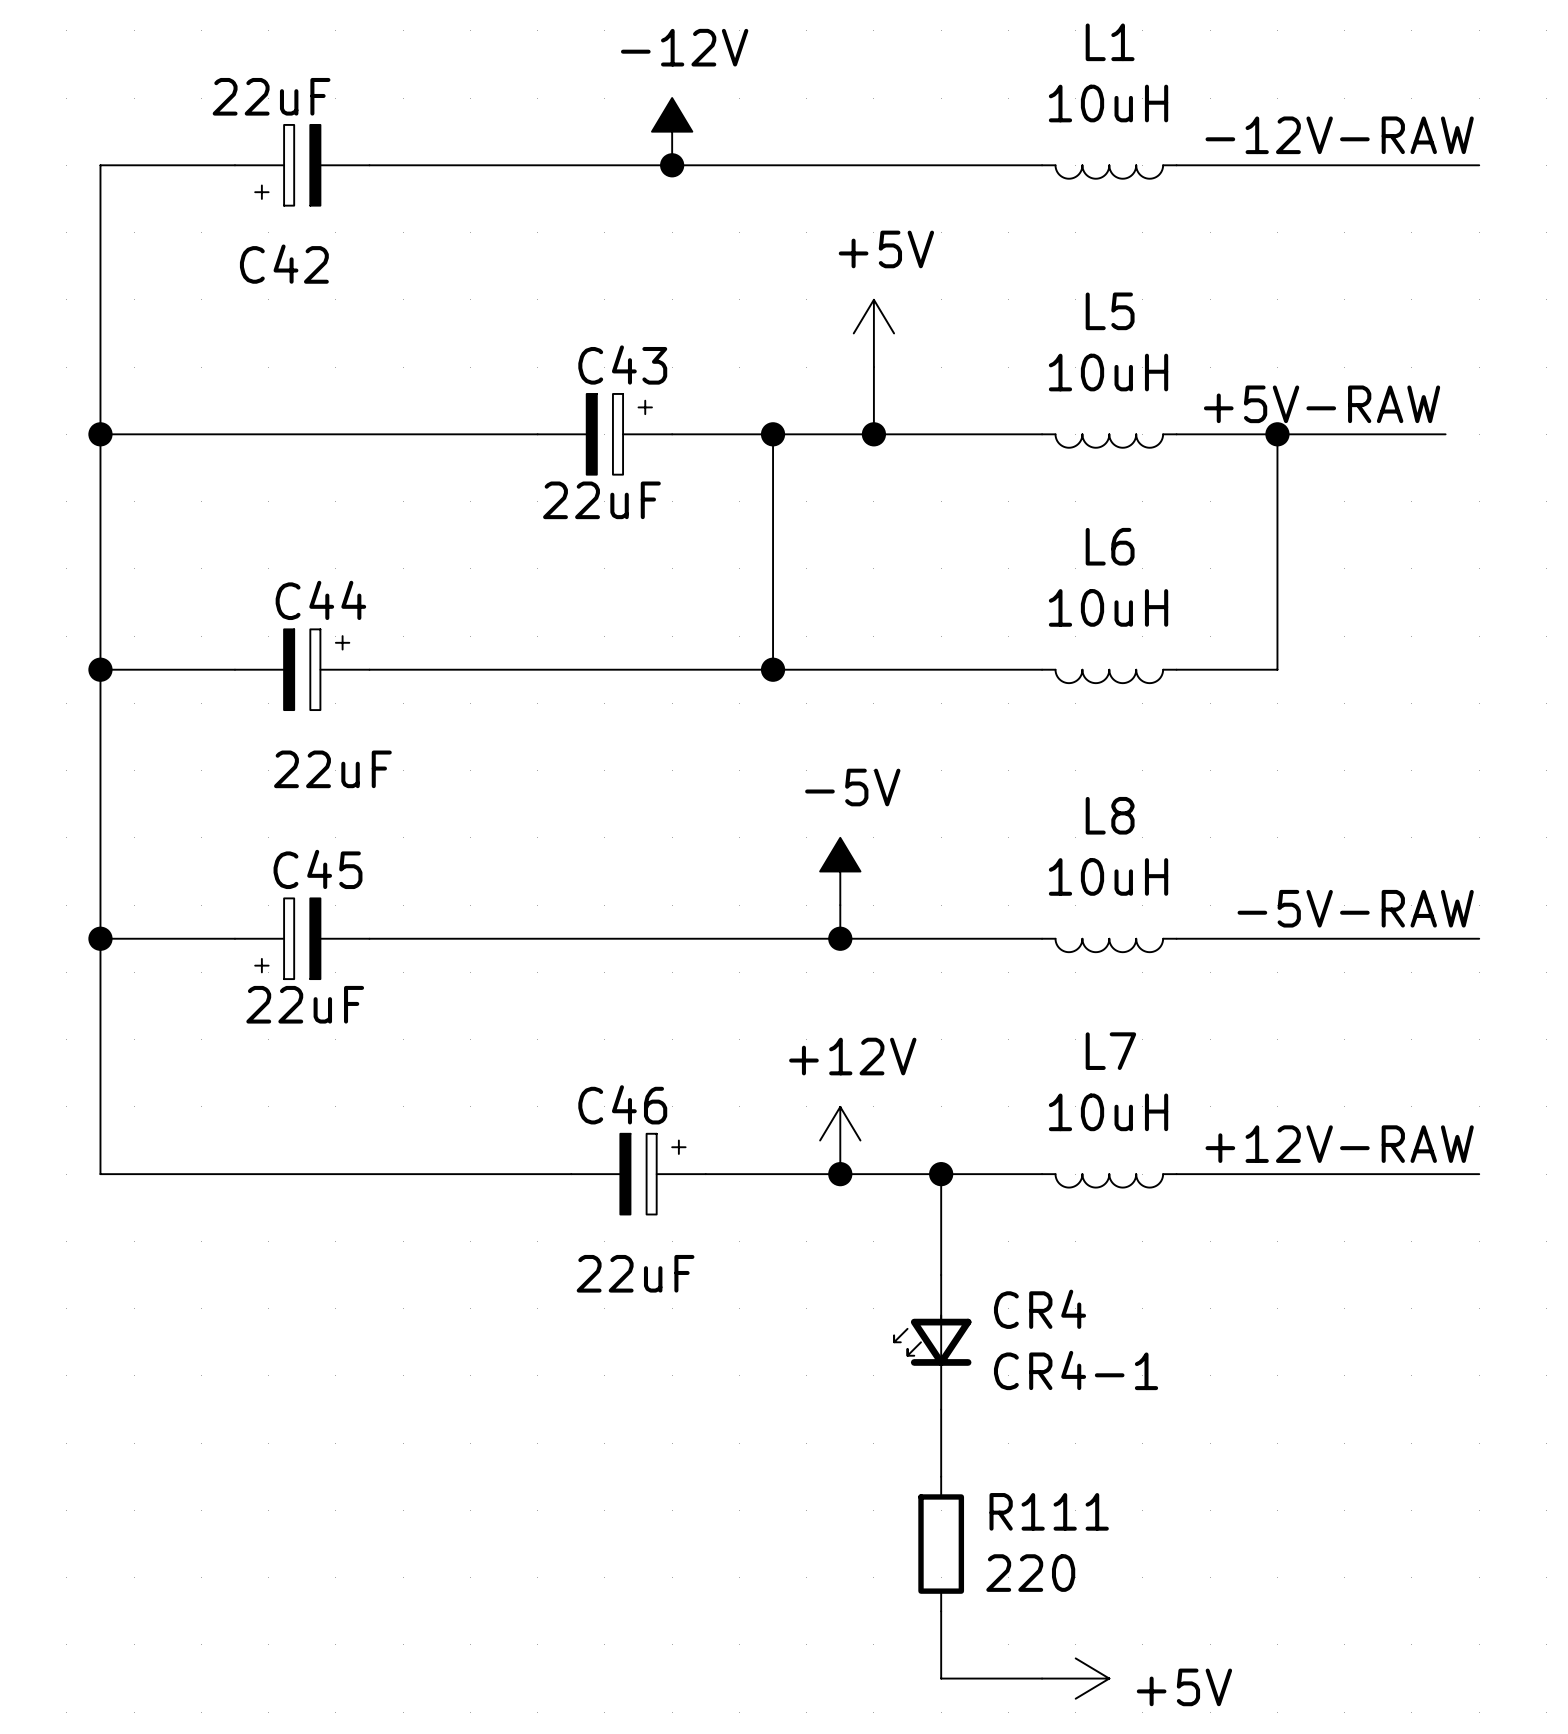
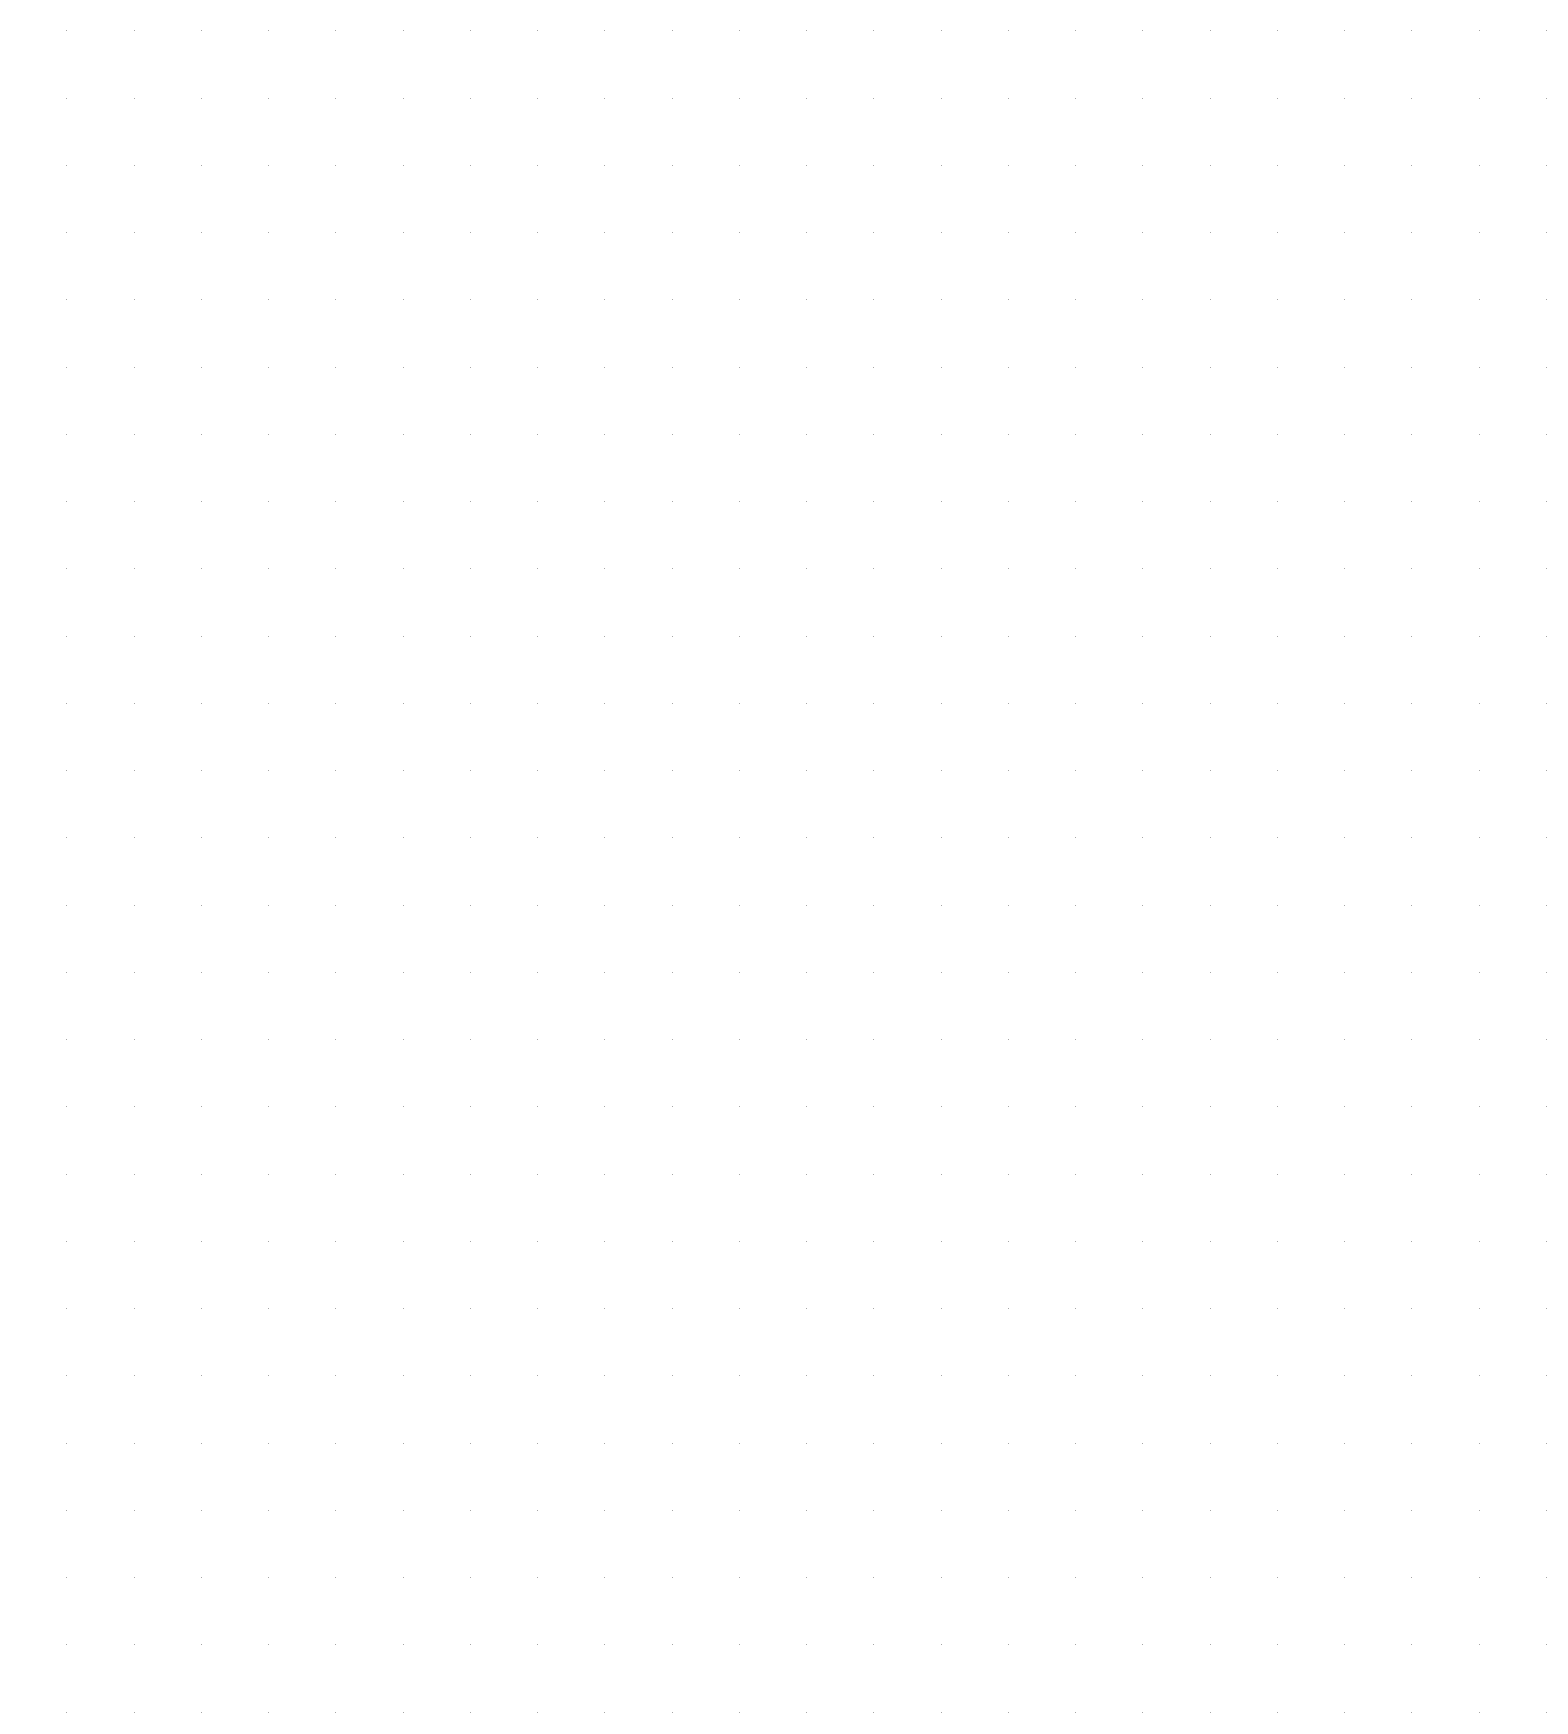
power symbol: -12V (672, 131) -> none
label: -12V-RAW (1339, 135) -> none
wire: (234, 165) (100, 165) (100, 1174) (571, 1174) -> none
C42: 22uF (302, 165) -> none
wire: (369, 165) (1042, 165) -> none
junction: (672, 165) -> none
wire: (1176, 165) (1479, 165) -> none
L1: 10uH (1109, 172) -> none
power symbol: +5V (873, 333) -> none
wire: (873, 367) (873, 434) -> none
label: +5V-RAW (1322, 404) -> none
wire: (100, 434) (537, 434) -> none
junction: (100, 434) -> none
C43: 22uF (604, 434) -> none
wire: (672, 434) (1042, 434) -> none
wire: (773, 434) (773, 669) -> none
junction: (773, 434) -> none
junction: (873, 434) -> none
wire: (1176, 434) (1445, 434) -> none
wire: (1277, 434) (1277, 669) (1176, 669) -> none
junction: (1277, 434) -> none
L5: 10uH (1109, 441) -> none
wire: (100, 669) (234, 669) -> none
junction: (100, 669) -> none
C44: 22uF (302, 669) -> none
wire: (369, 669) (1042, 669) -> none
junction: (773, 669) -> none
L6: 10uH (1109, 676) -> none
power symbol: -5V (840, 871) -> none
wire: (840, 905) (840, 938) -> none
label: -5V-RAW (1355, 908) -> none
wire: (100, 938) (234, 938) -> none
junction: (100, 938) -> none
C45: 22uF (302, 938) -> none
wire: (369, 938) (1042, 938) -> none
junction: (840, 938) -> none
wire: (1176, 938) (1479, 938) -> none
L8: 10uH (1109, 945) -> none
power symbol: +12V (840, 1140) -> none
label: +12V-RAW (1339, 1144) -> none
C46: 22uF (638, 1174) -> none
wire: (705, 1174) (1042, 1174) -> none
junction: (840, 1174) -> none
wire: (941, 1174) (941, 1275) -> none
junction: (941, 1174) -> none
wire: (1176, 1174) (1479, 1174) -> none
L7: 10uH (1109, 1180) -> none
CR4: CR4-1 (932, 1342) -> none
wire: (941, 1409) (941, 1476) -> none
R111: 220 (941, 1544) -> none
wire: (941, 1611) (941, 1678) (1042, 1678) -> none
power symbol: +5V (1075, 1678) -> none

